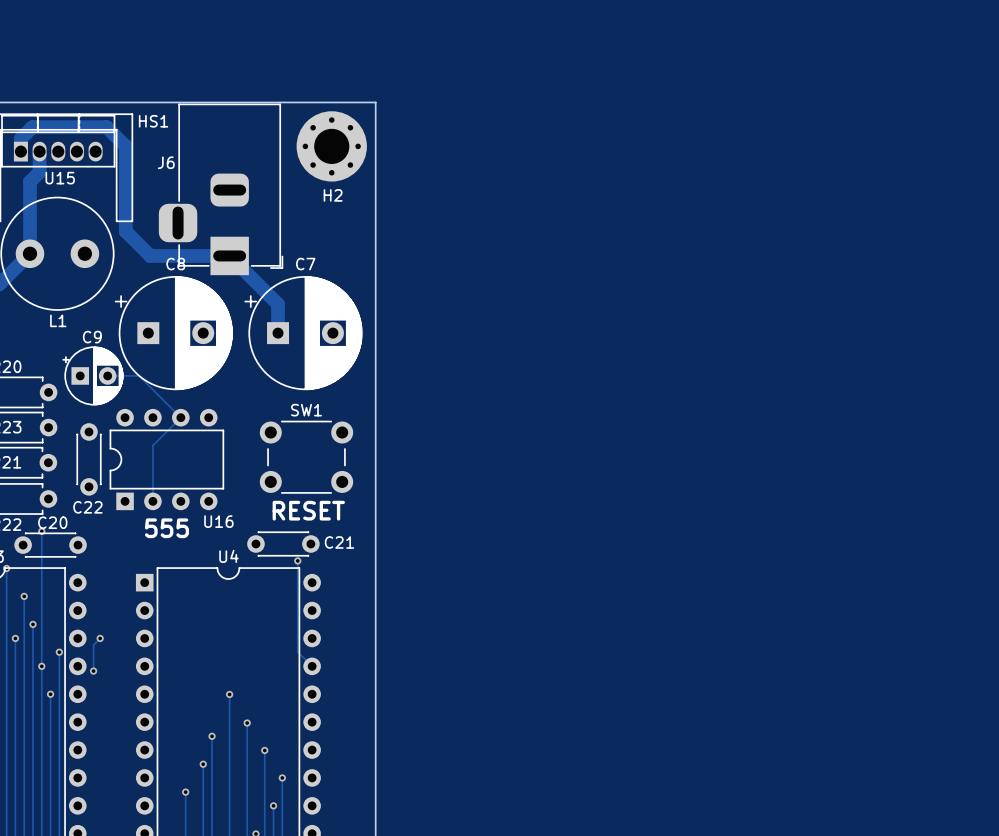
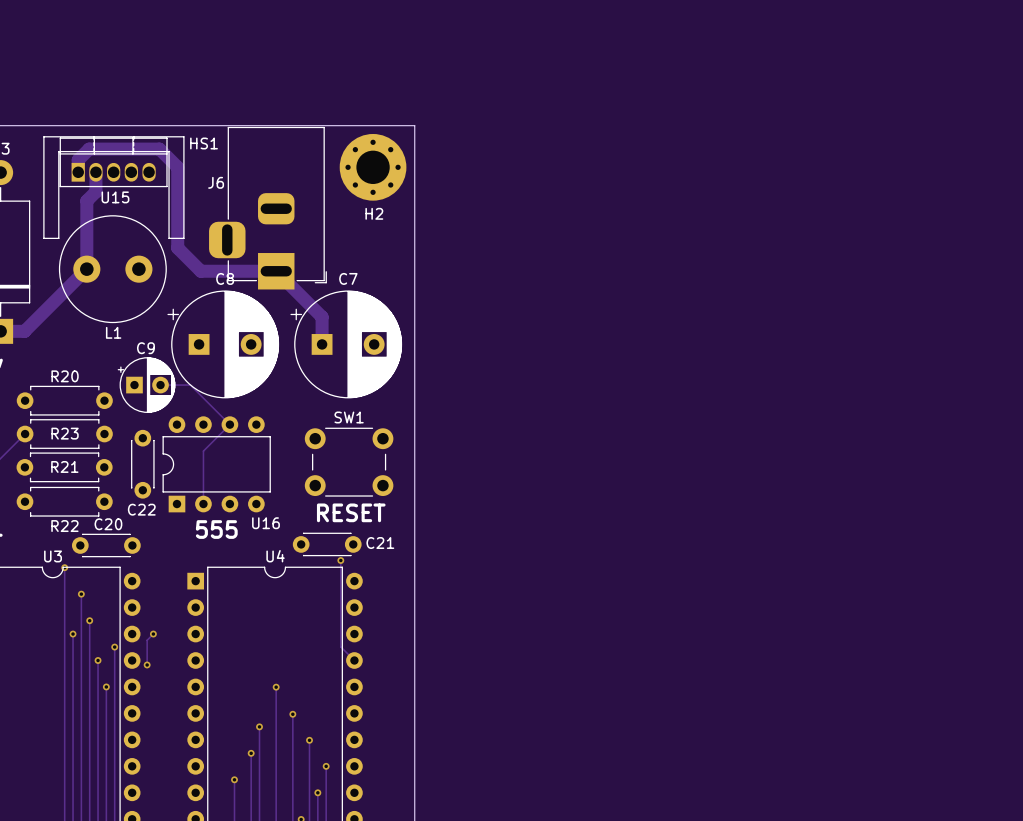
track: (41, 531) (41, 666) -> none
via: (41, 531) -> none

